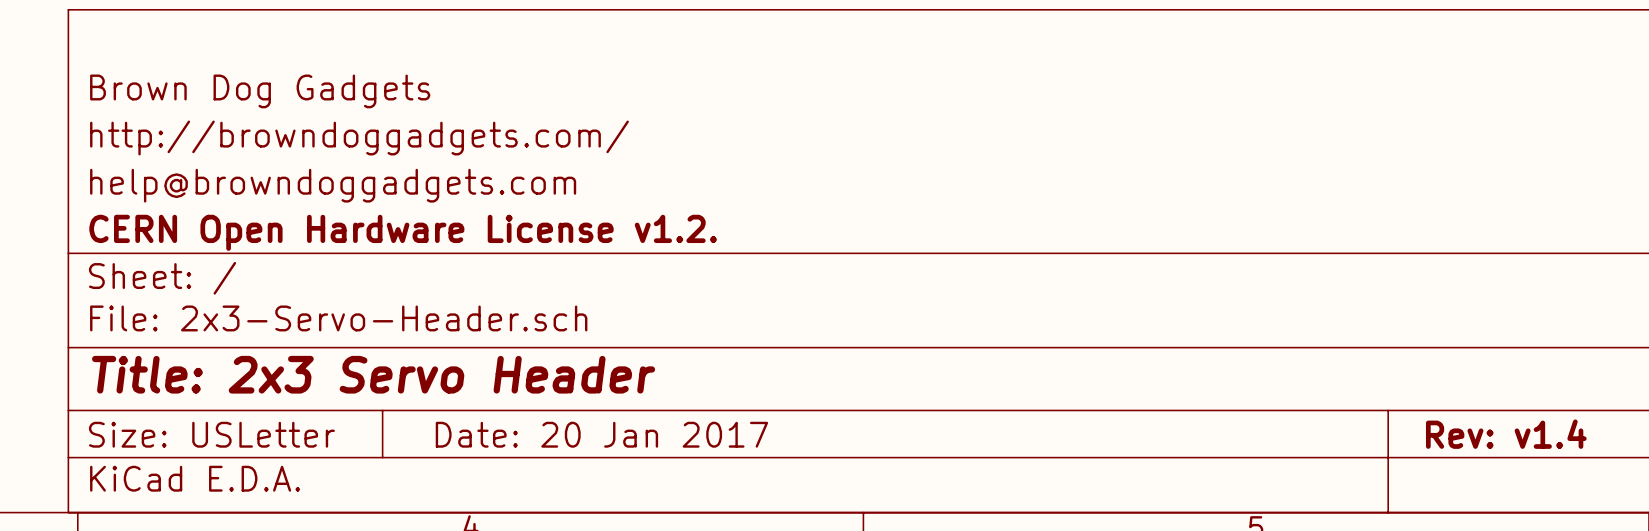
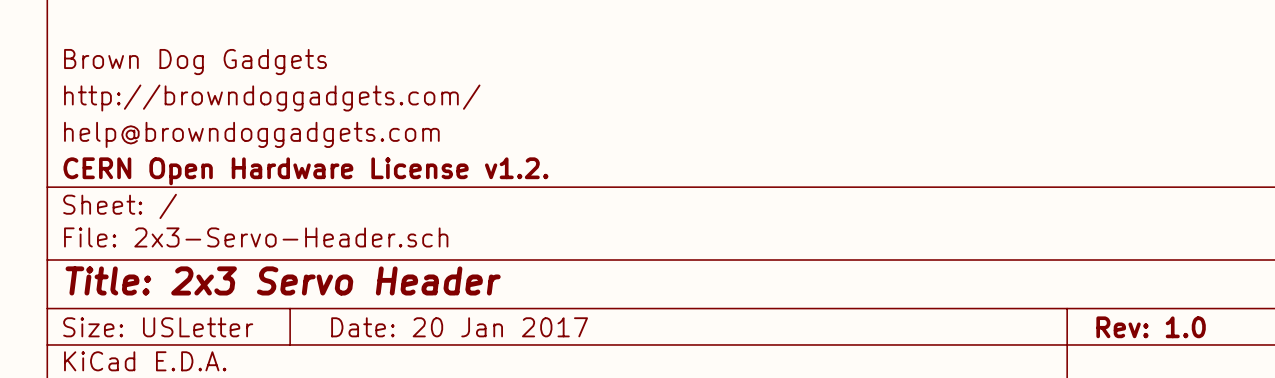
title block: Rev: v1.4 (1506, 434) -> Rev: 1.0 (1151, 327)

